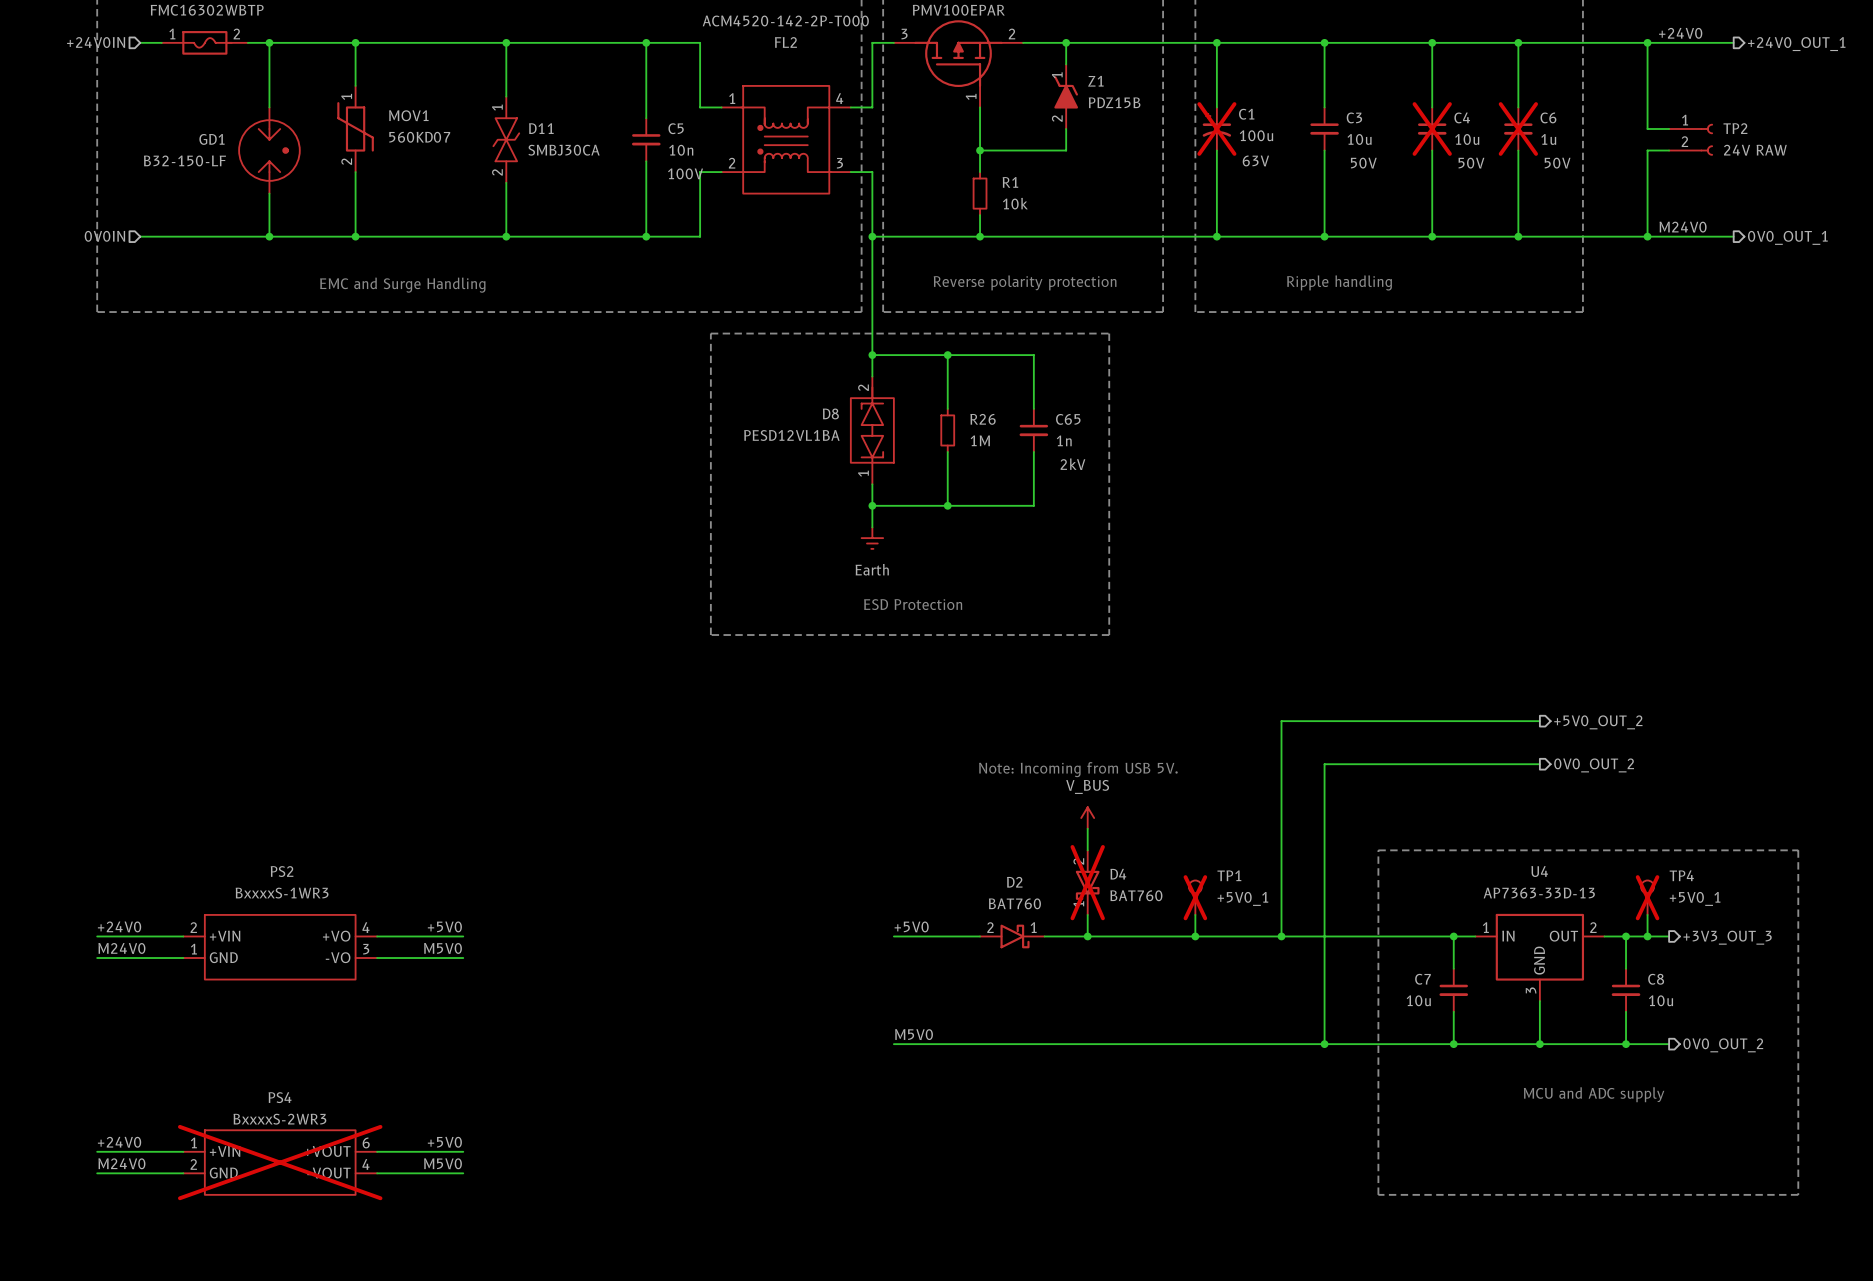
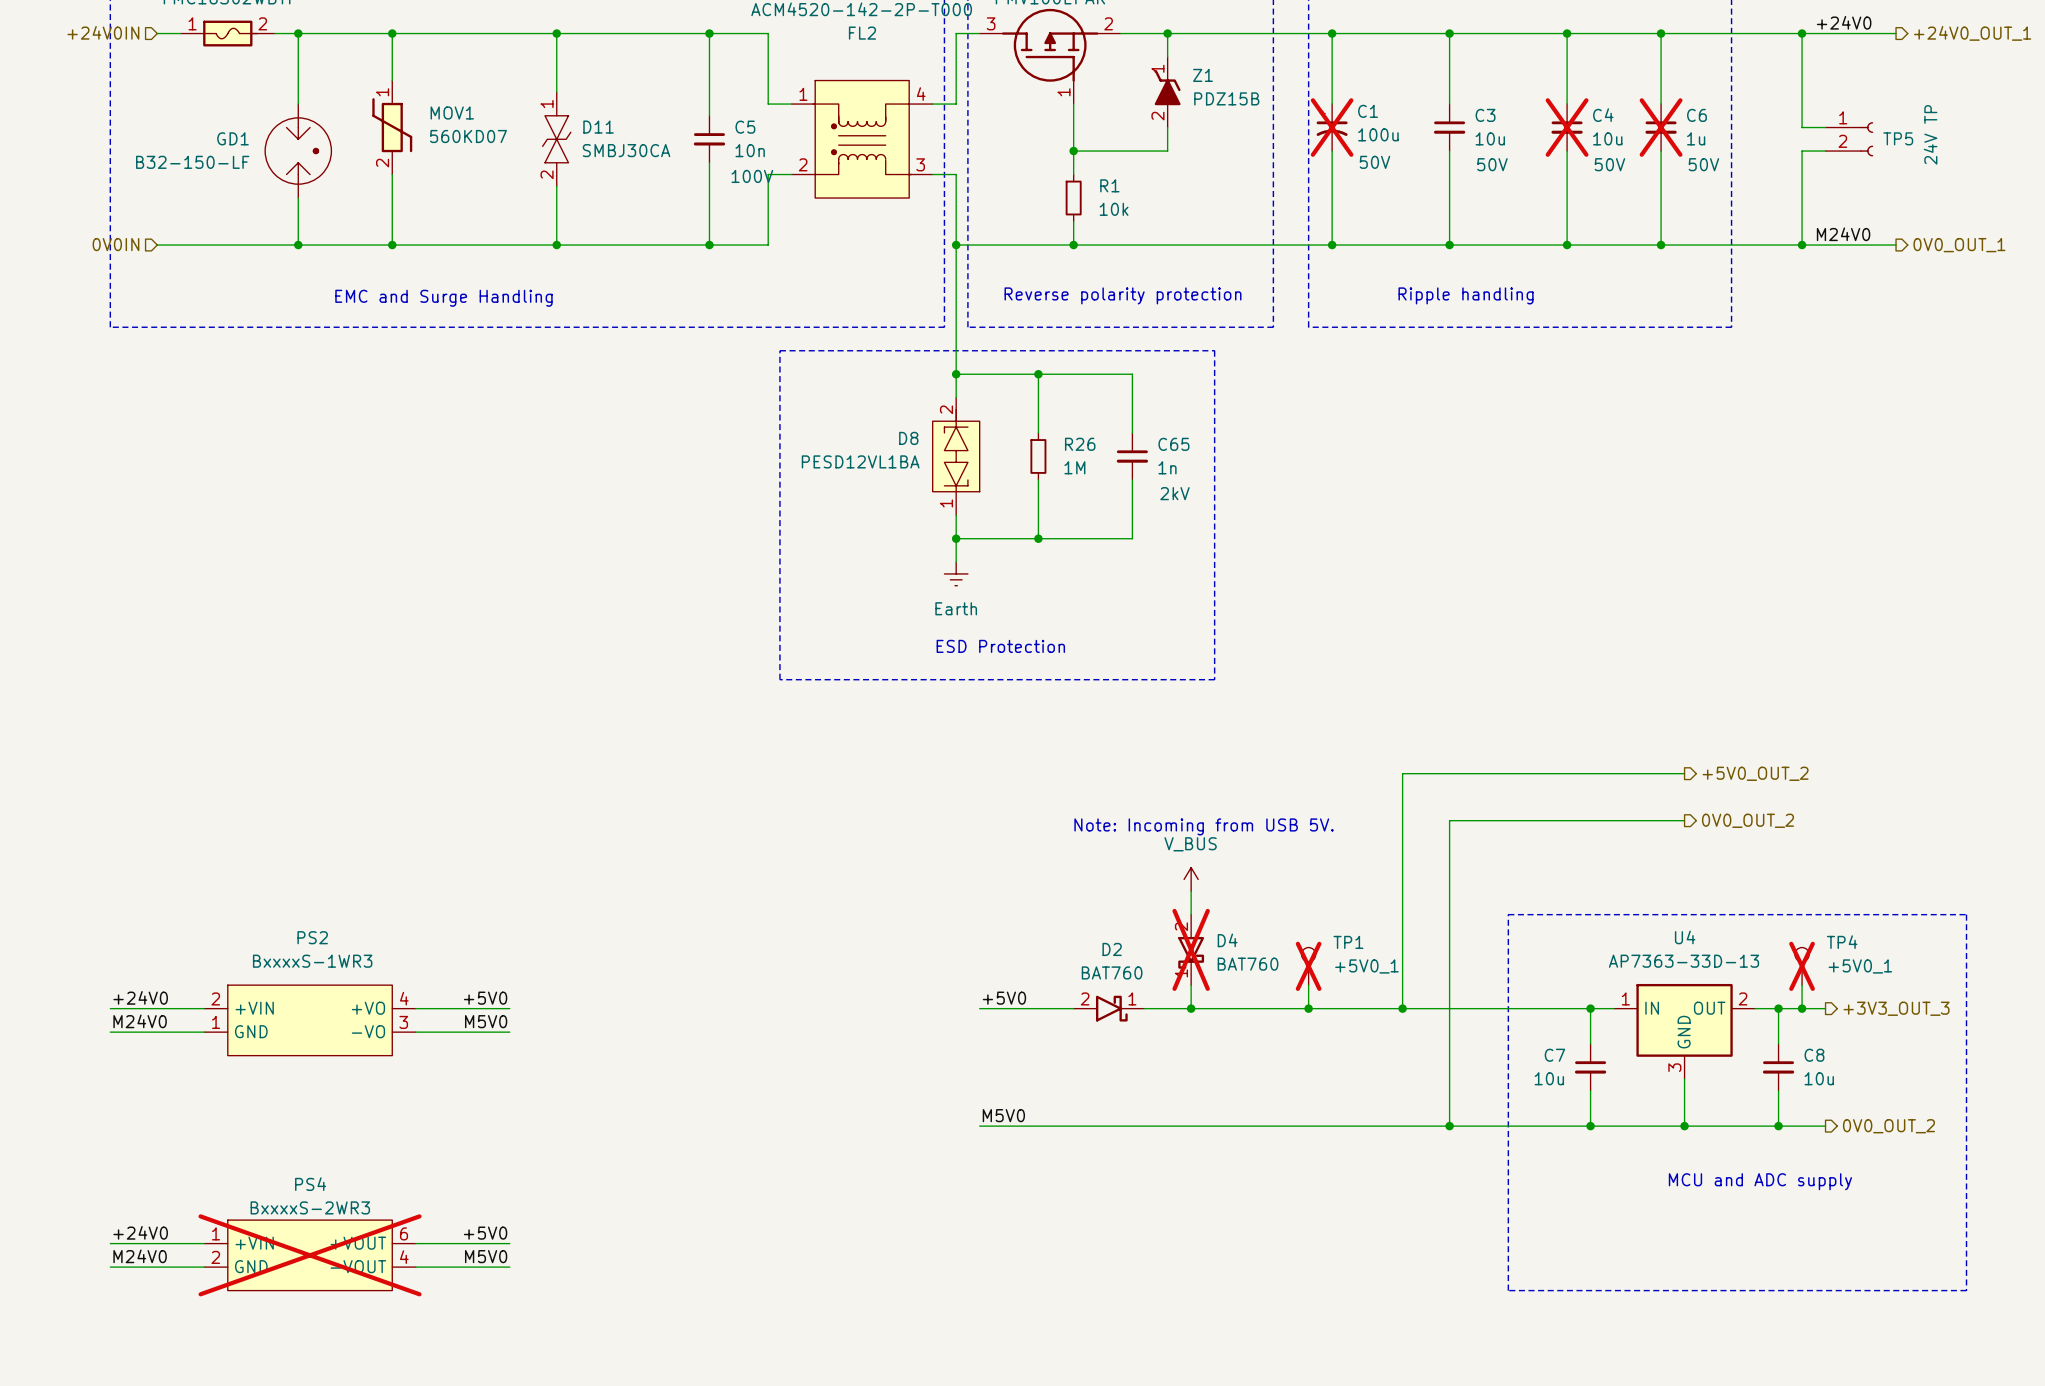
TP2 name: TP2 (1735, 128) -> TP5 (1898, 138)
TP2 text: none -> 24V TP (1930, 134)
TP2 value: 24V RAW (1755, 150) -> none
C1 text: 63V (1255, 160) -> 50V (1374, 162)

